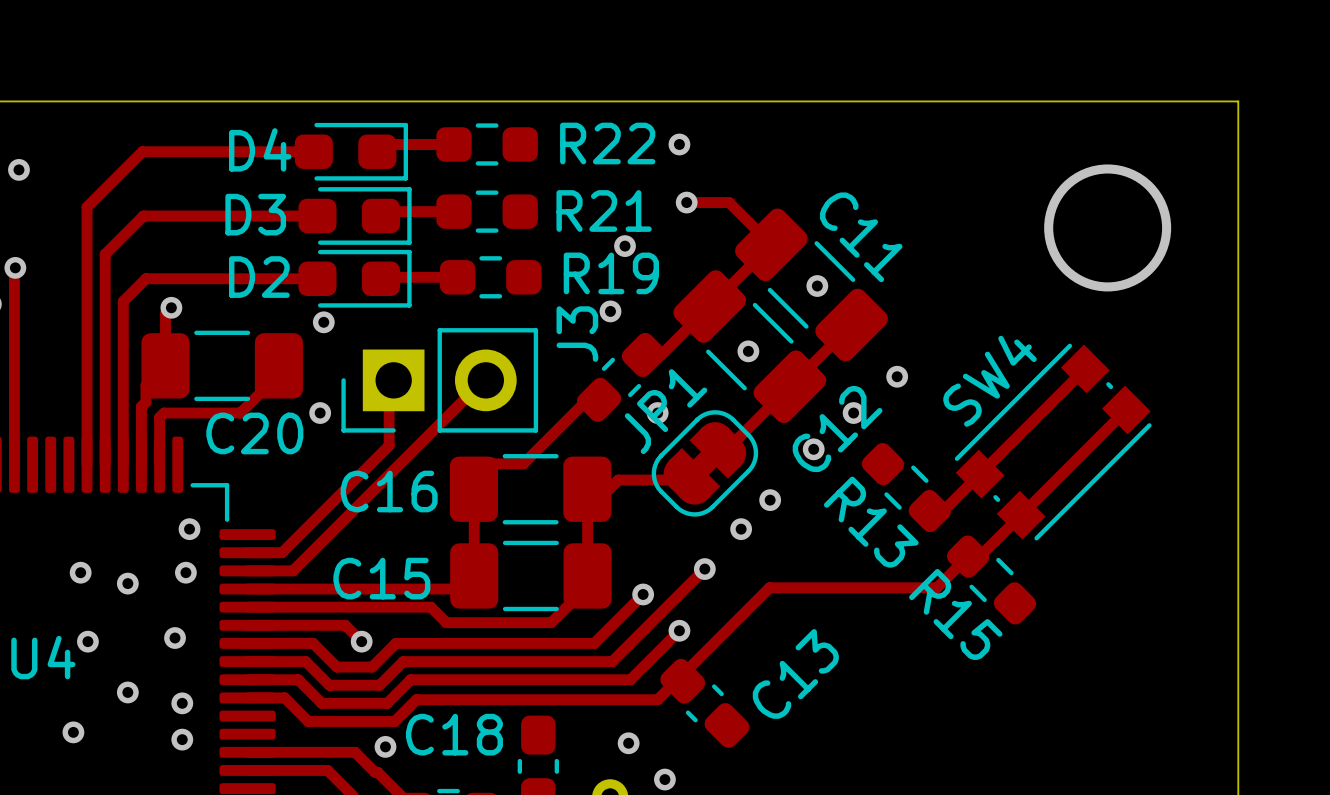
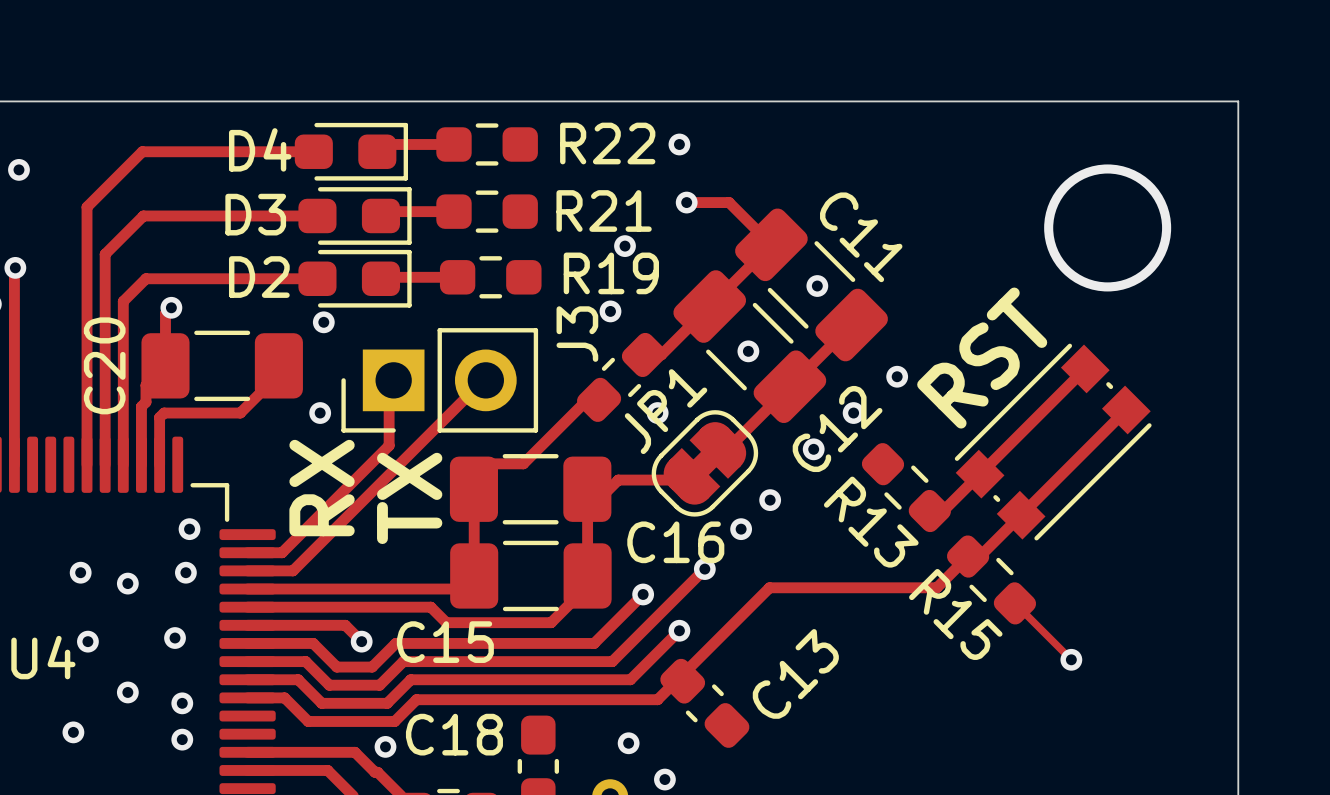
text: none -> RST (982, 358)
SW4 name: SW4 (989, 381) -> none
C20 name rotation: 0° (254, 433) -> 90° counterclockwise (104, 365)
C20 name position: C20 (254, 433) -> C20 (104, 365)
text: none -> RX (322, 488)
C16 name position: C16 (389, 491) -> C16 (675, 542)
text: none -> TX (409, 498)
C15 name position: C15 (381, 578) -> C15 (445, 642)
track: none -> (1014, 603) (1071, 659)
via: none -> (1071, 659)

